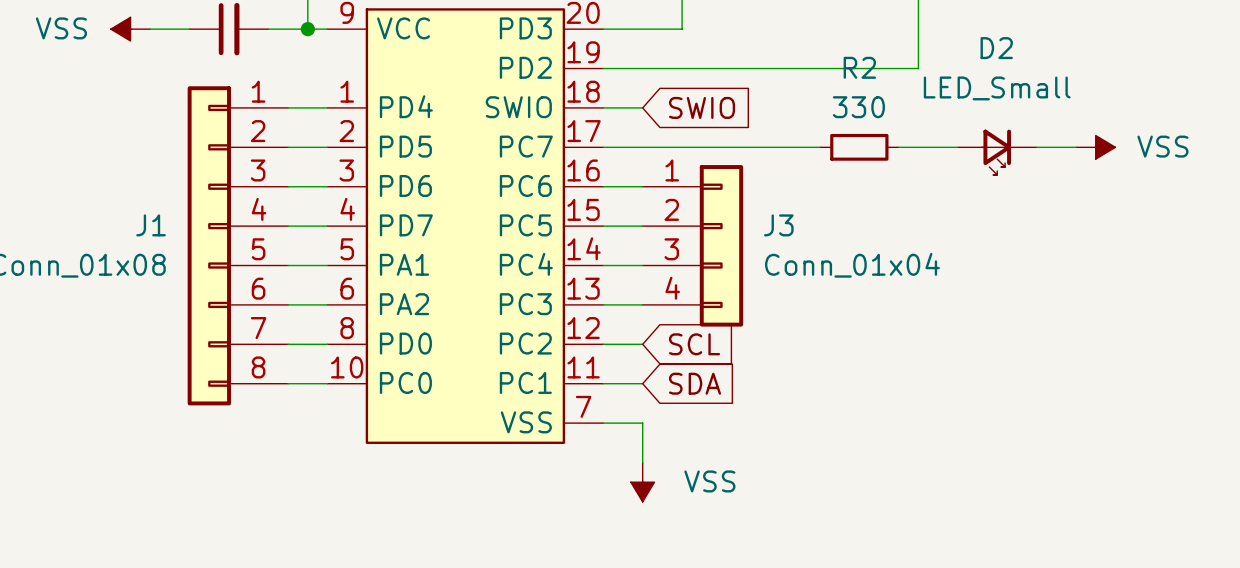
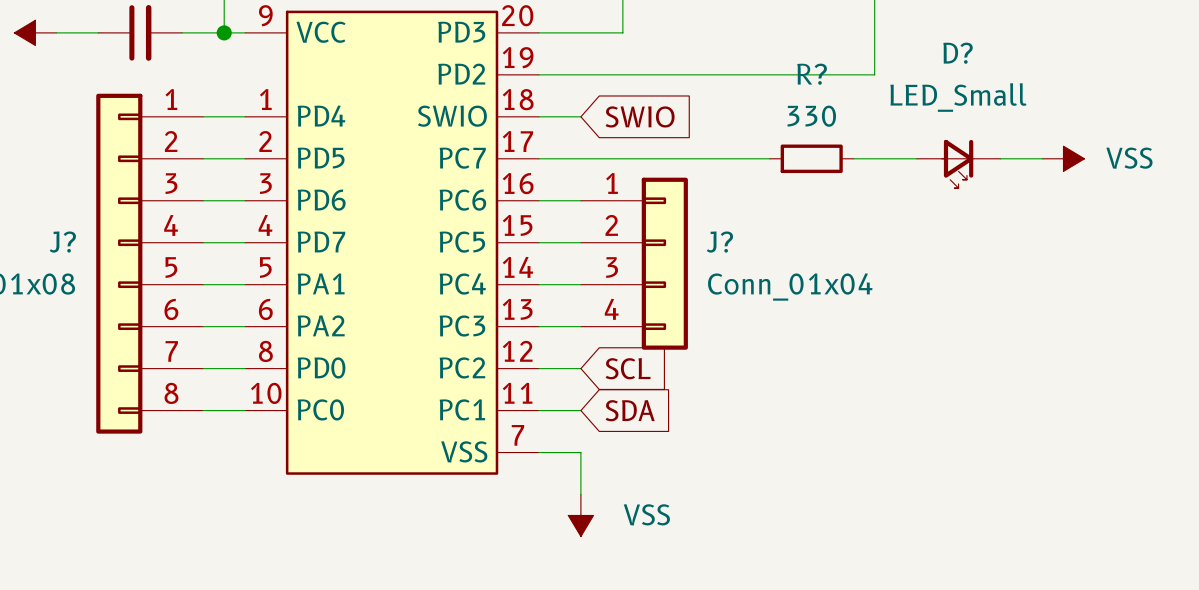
D2 name: D2 (996, 48) -> D? (958, 53)
R2 name: R2 (859, 67) -> R? (812, 74)
J1 name: J1 (151, 225) -> J? (62, 242)
J3 name: J3 (778, 225) -> J? (719, 242)

